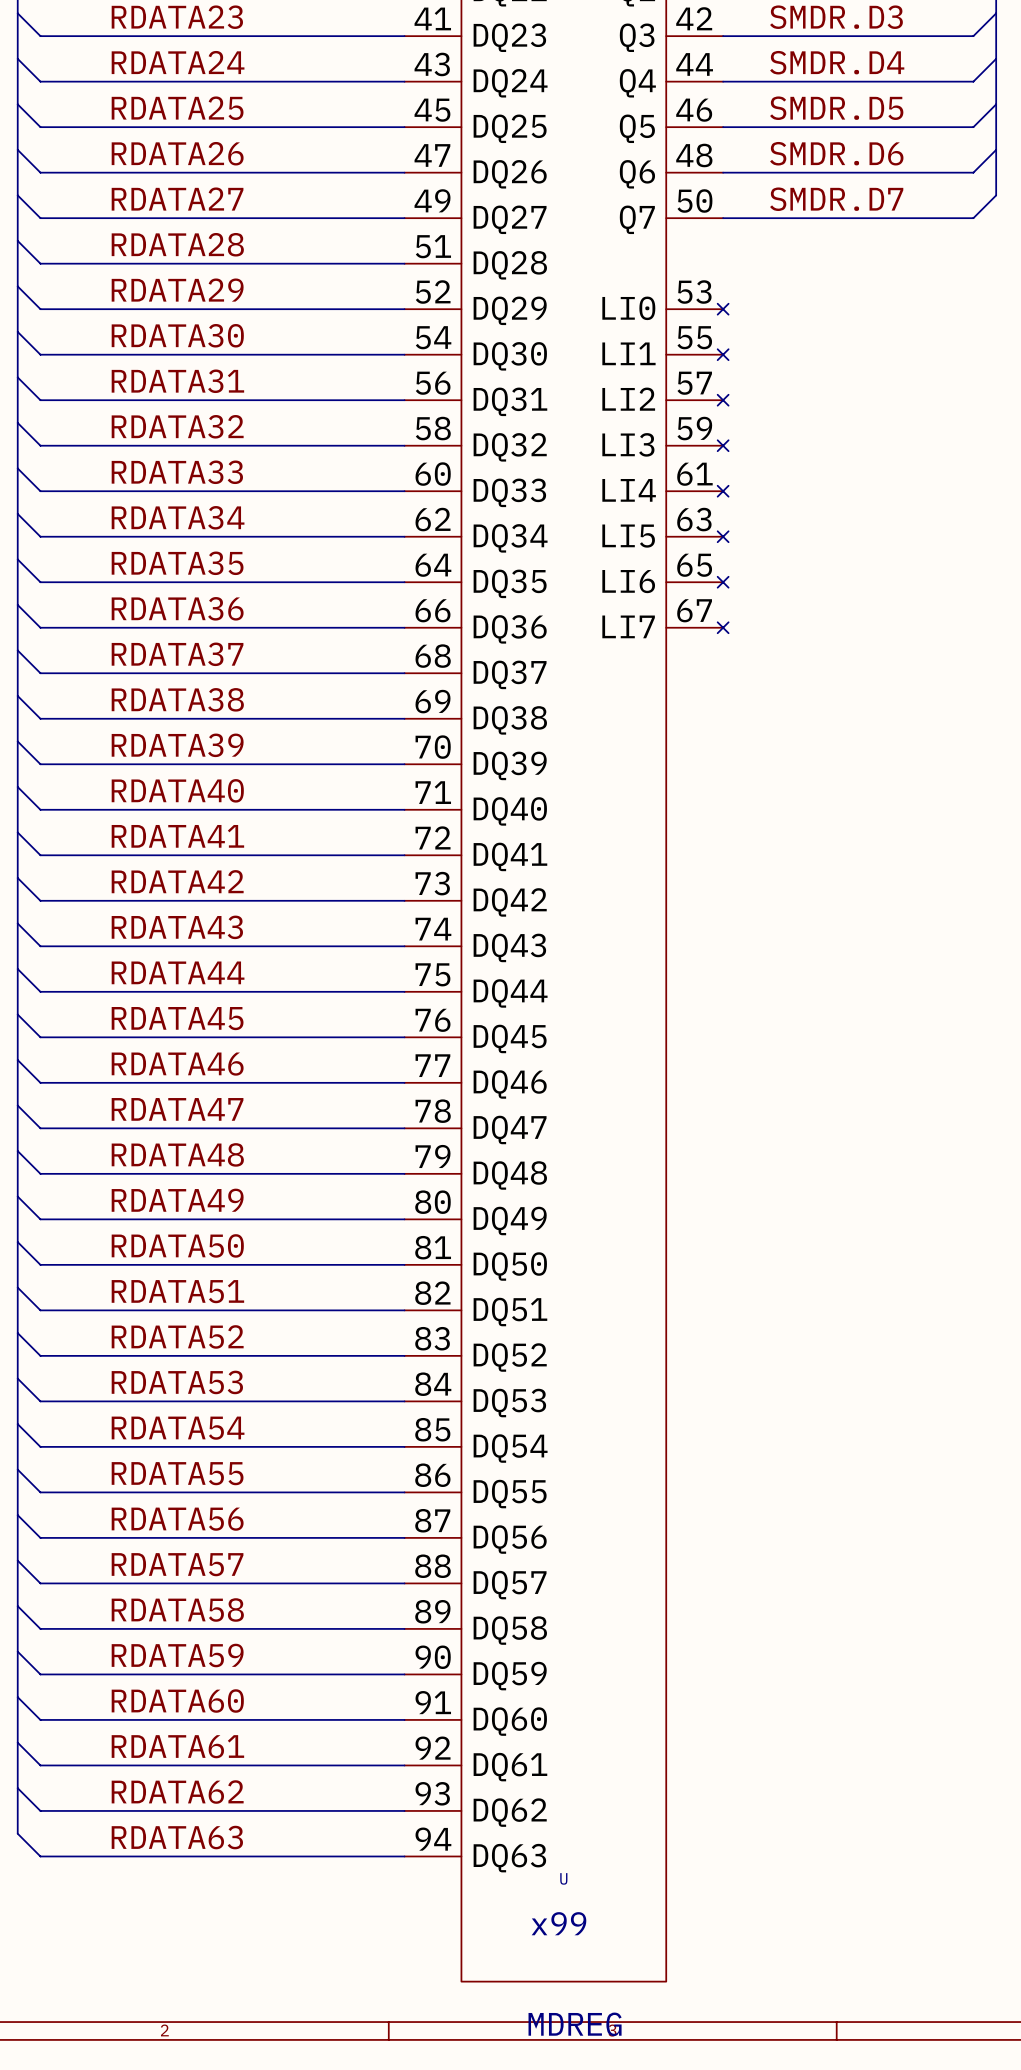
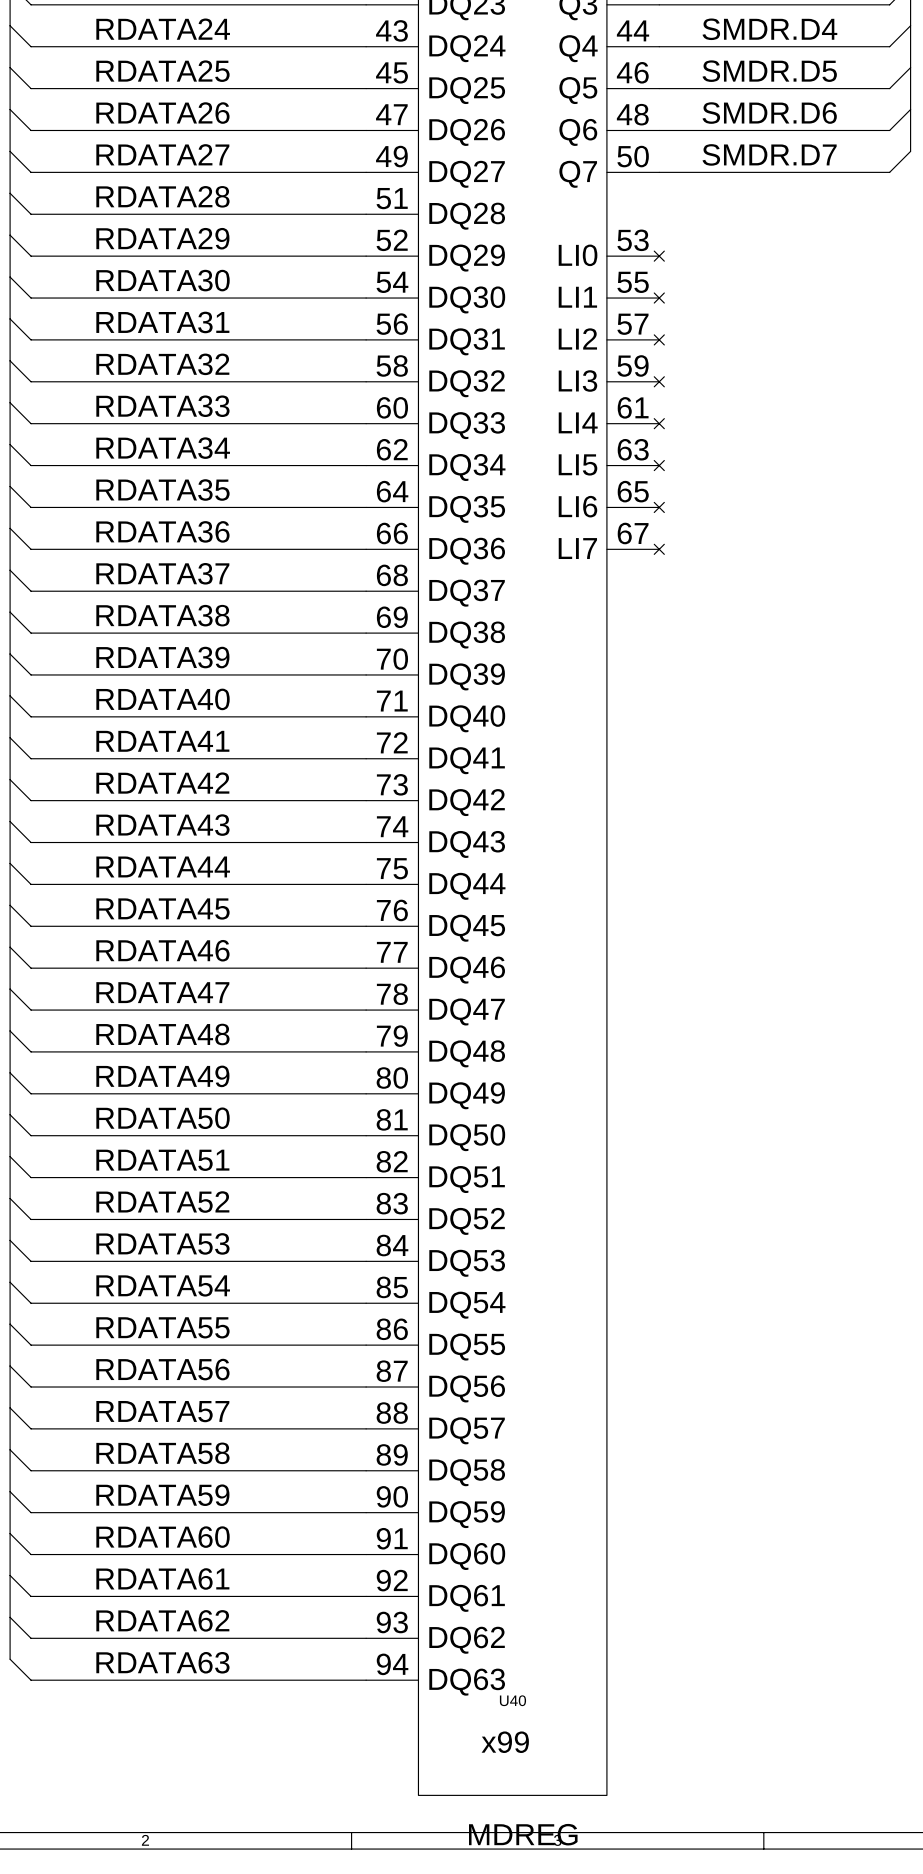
U name: U (563, 1878) -> U40 (512, 1700)

